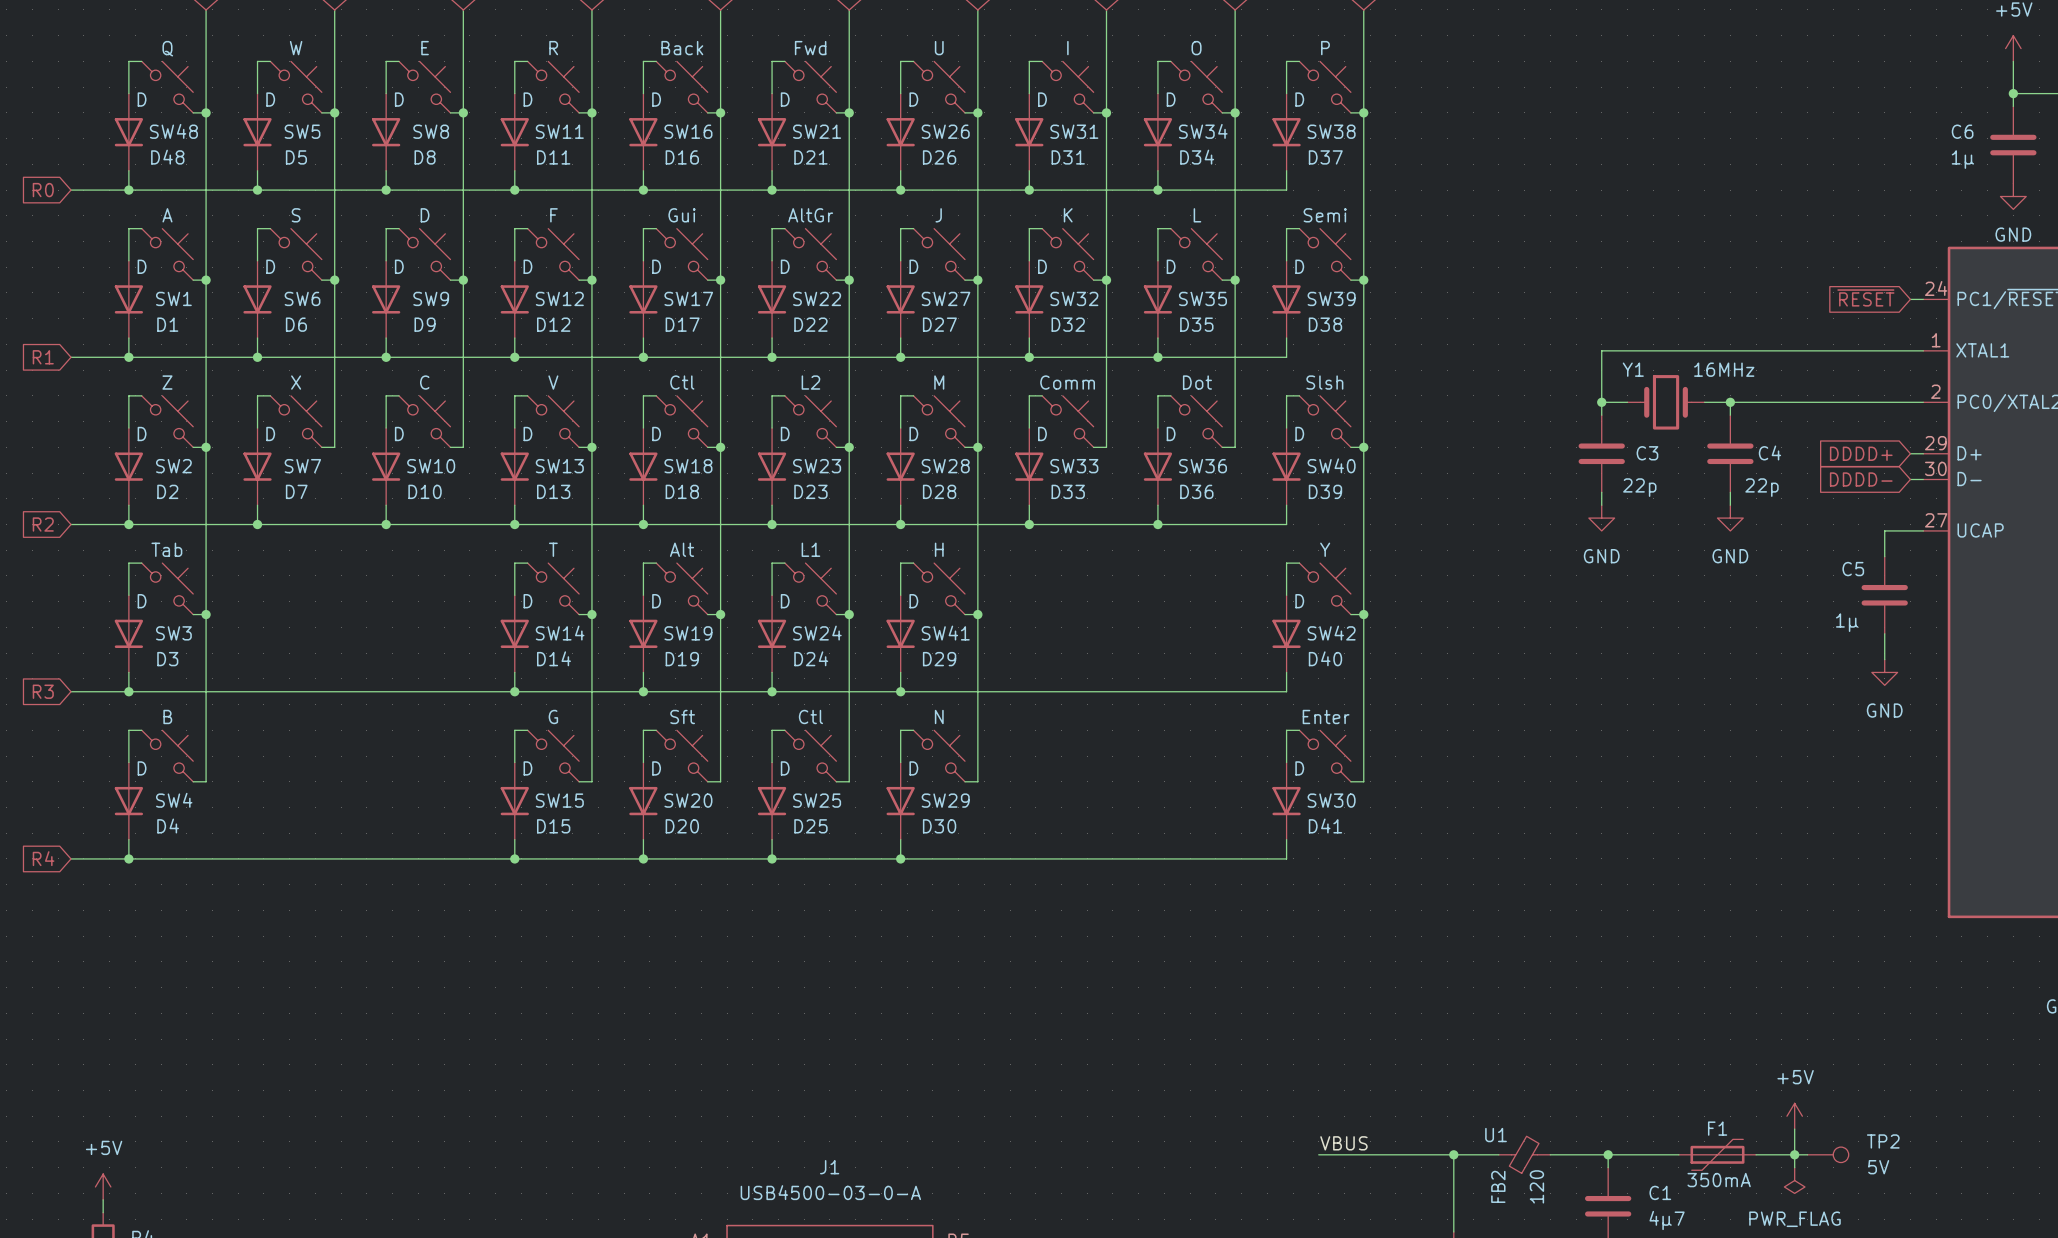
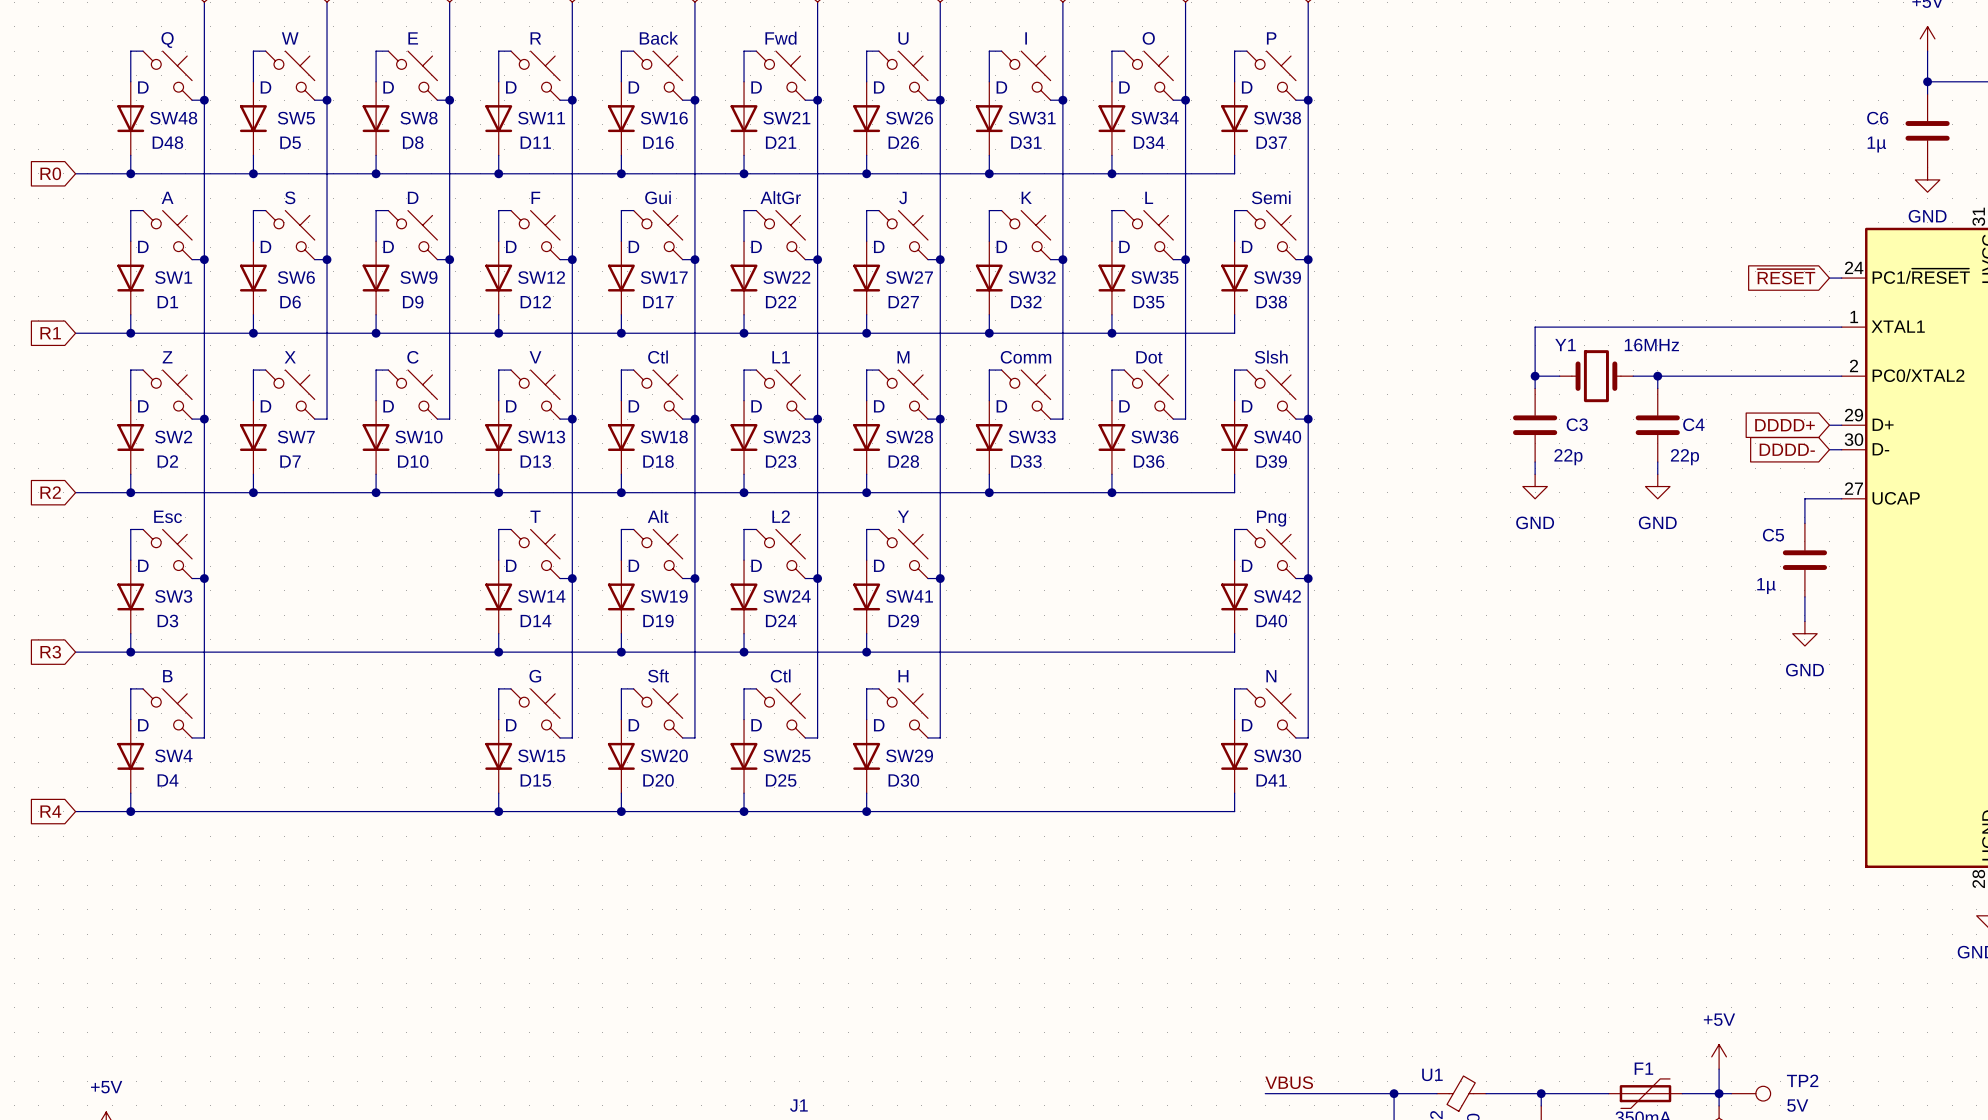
SW23 value: L2 (810, 382) -> L1 (781, 357)
SW3 value: Tab (166, 549) -> Esc (168, 516)
SW24 value: L1 (810, 549) -> L2 (781, 516)
SW41 value: H (939, 549) -> Y (903, 516)
SW42 value: Y (1325, 549) -> Png (1271, 518)
SW29 value: N (939, 716) -> H (903, 676)
SW30 value: Enter (1326, 716) -> N (1271, 676)

